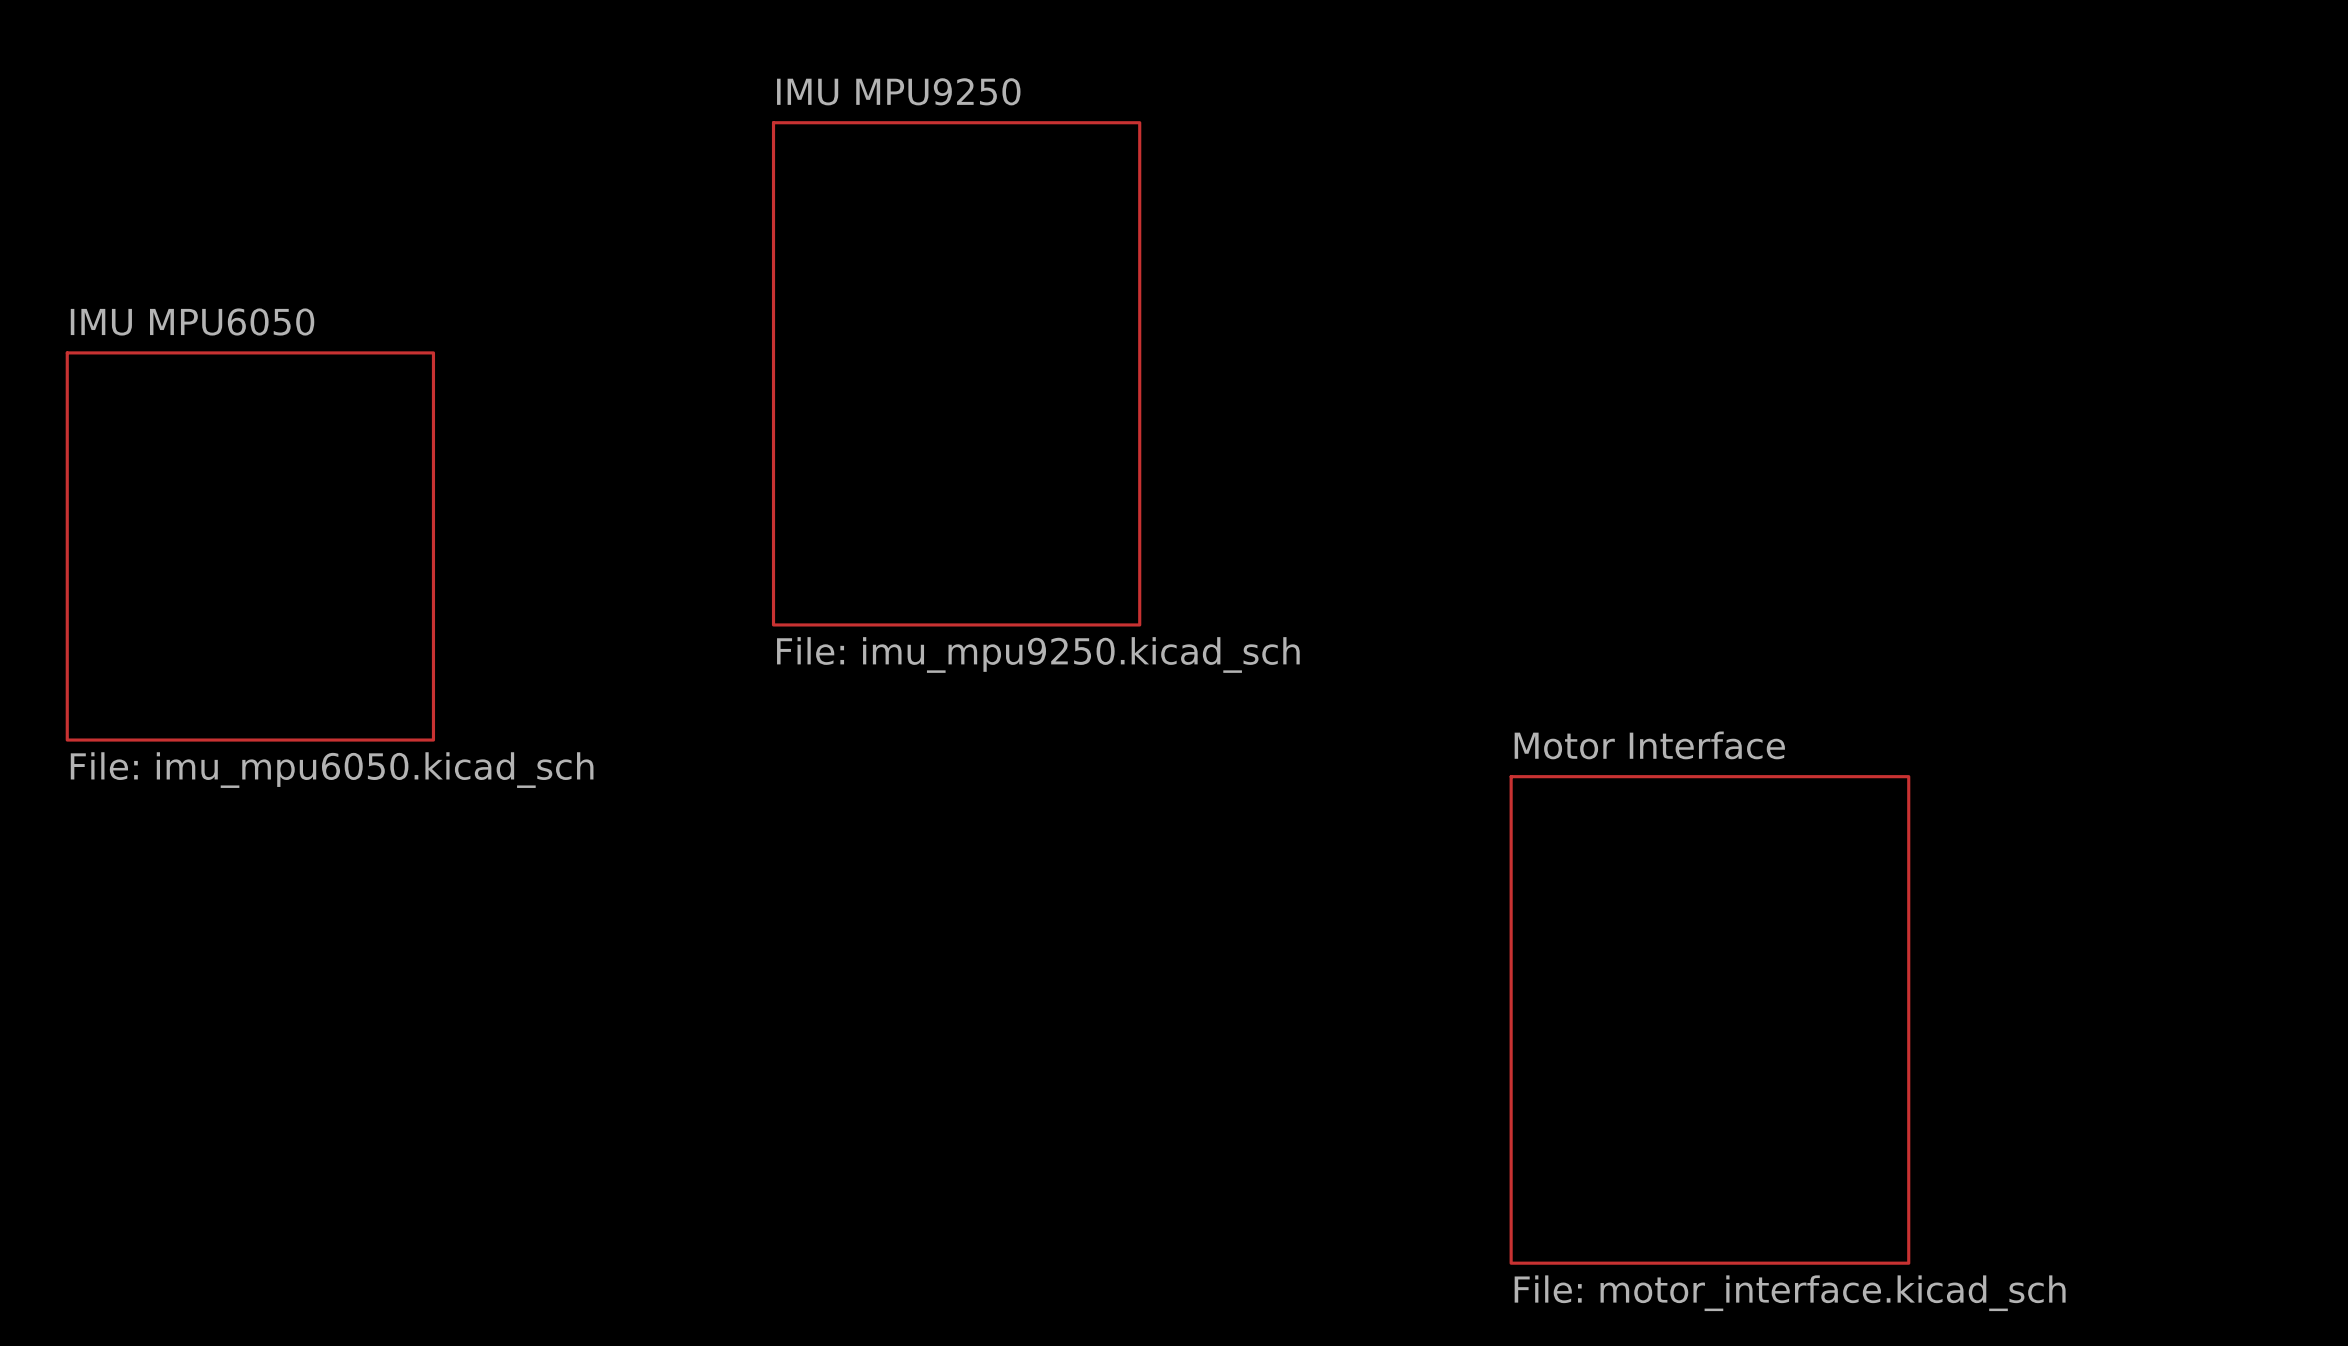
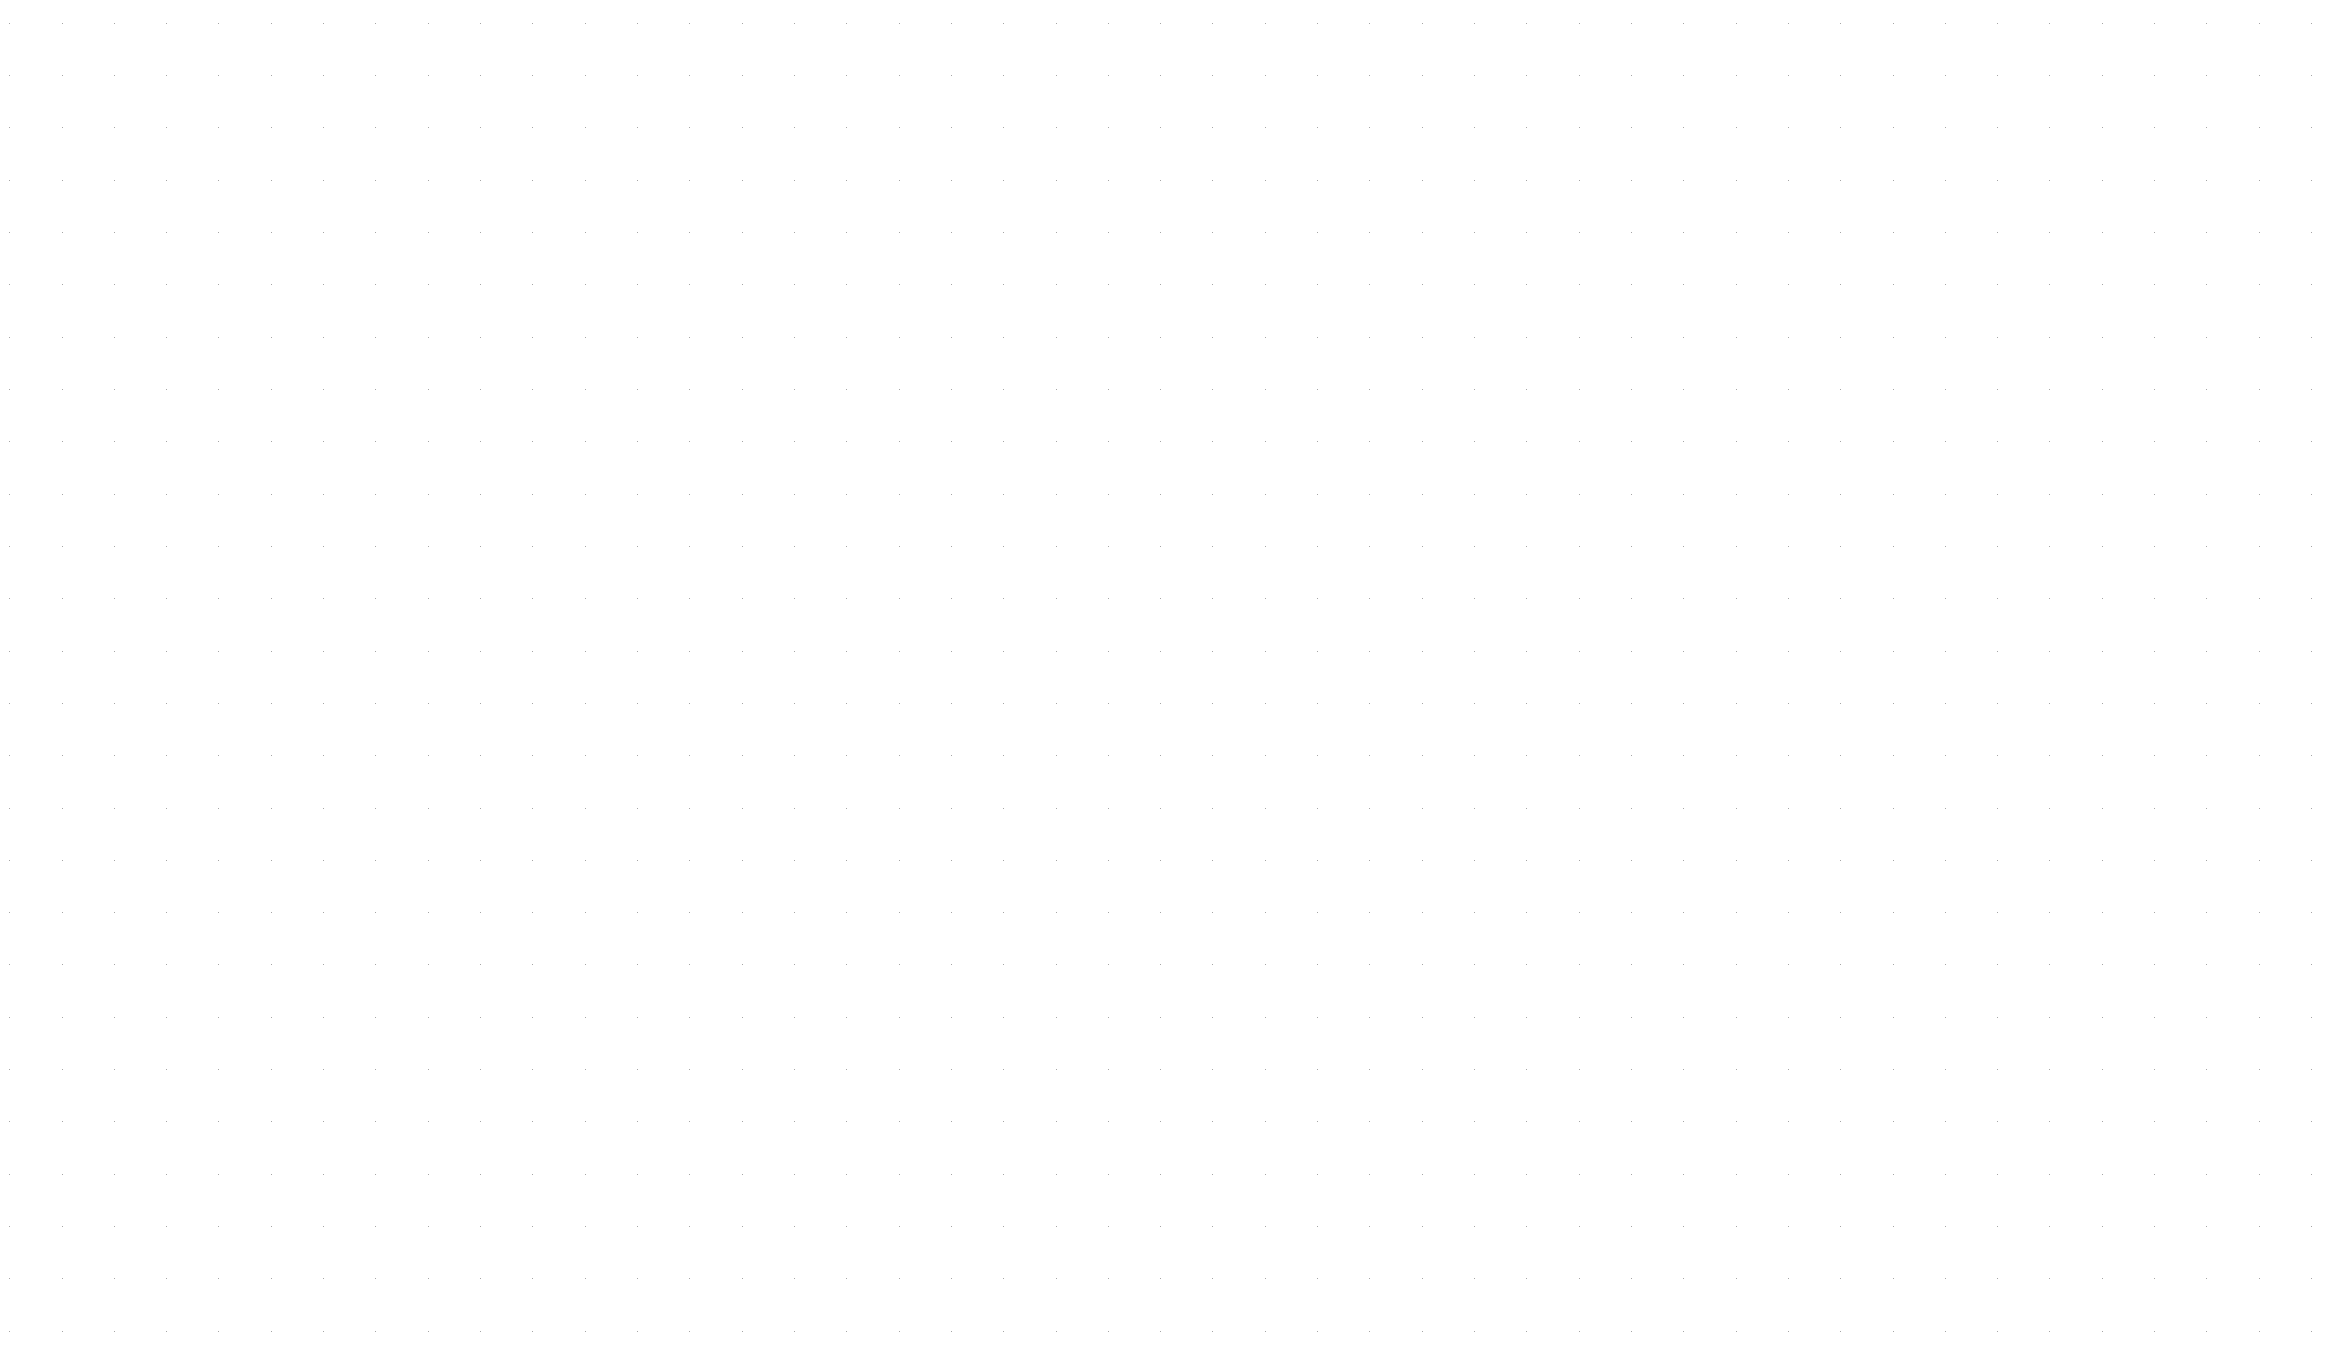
sheet IMU MPU9250: File: imu_mpu9250.kicad_sch (956, 373) -> none
sheet IMU MPU6050: File: imu_mpu6050.kicad_sch (250, 546) -> none
sheet Motor Interface: File: motor_interface.kicad_sch (1709, 1019) -> none

